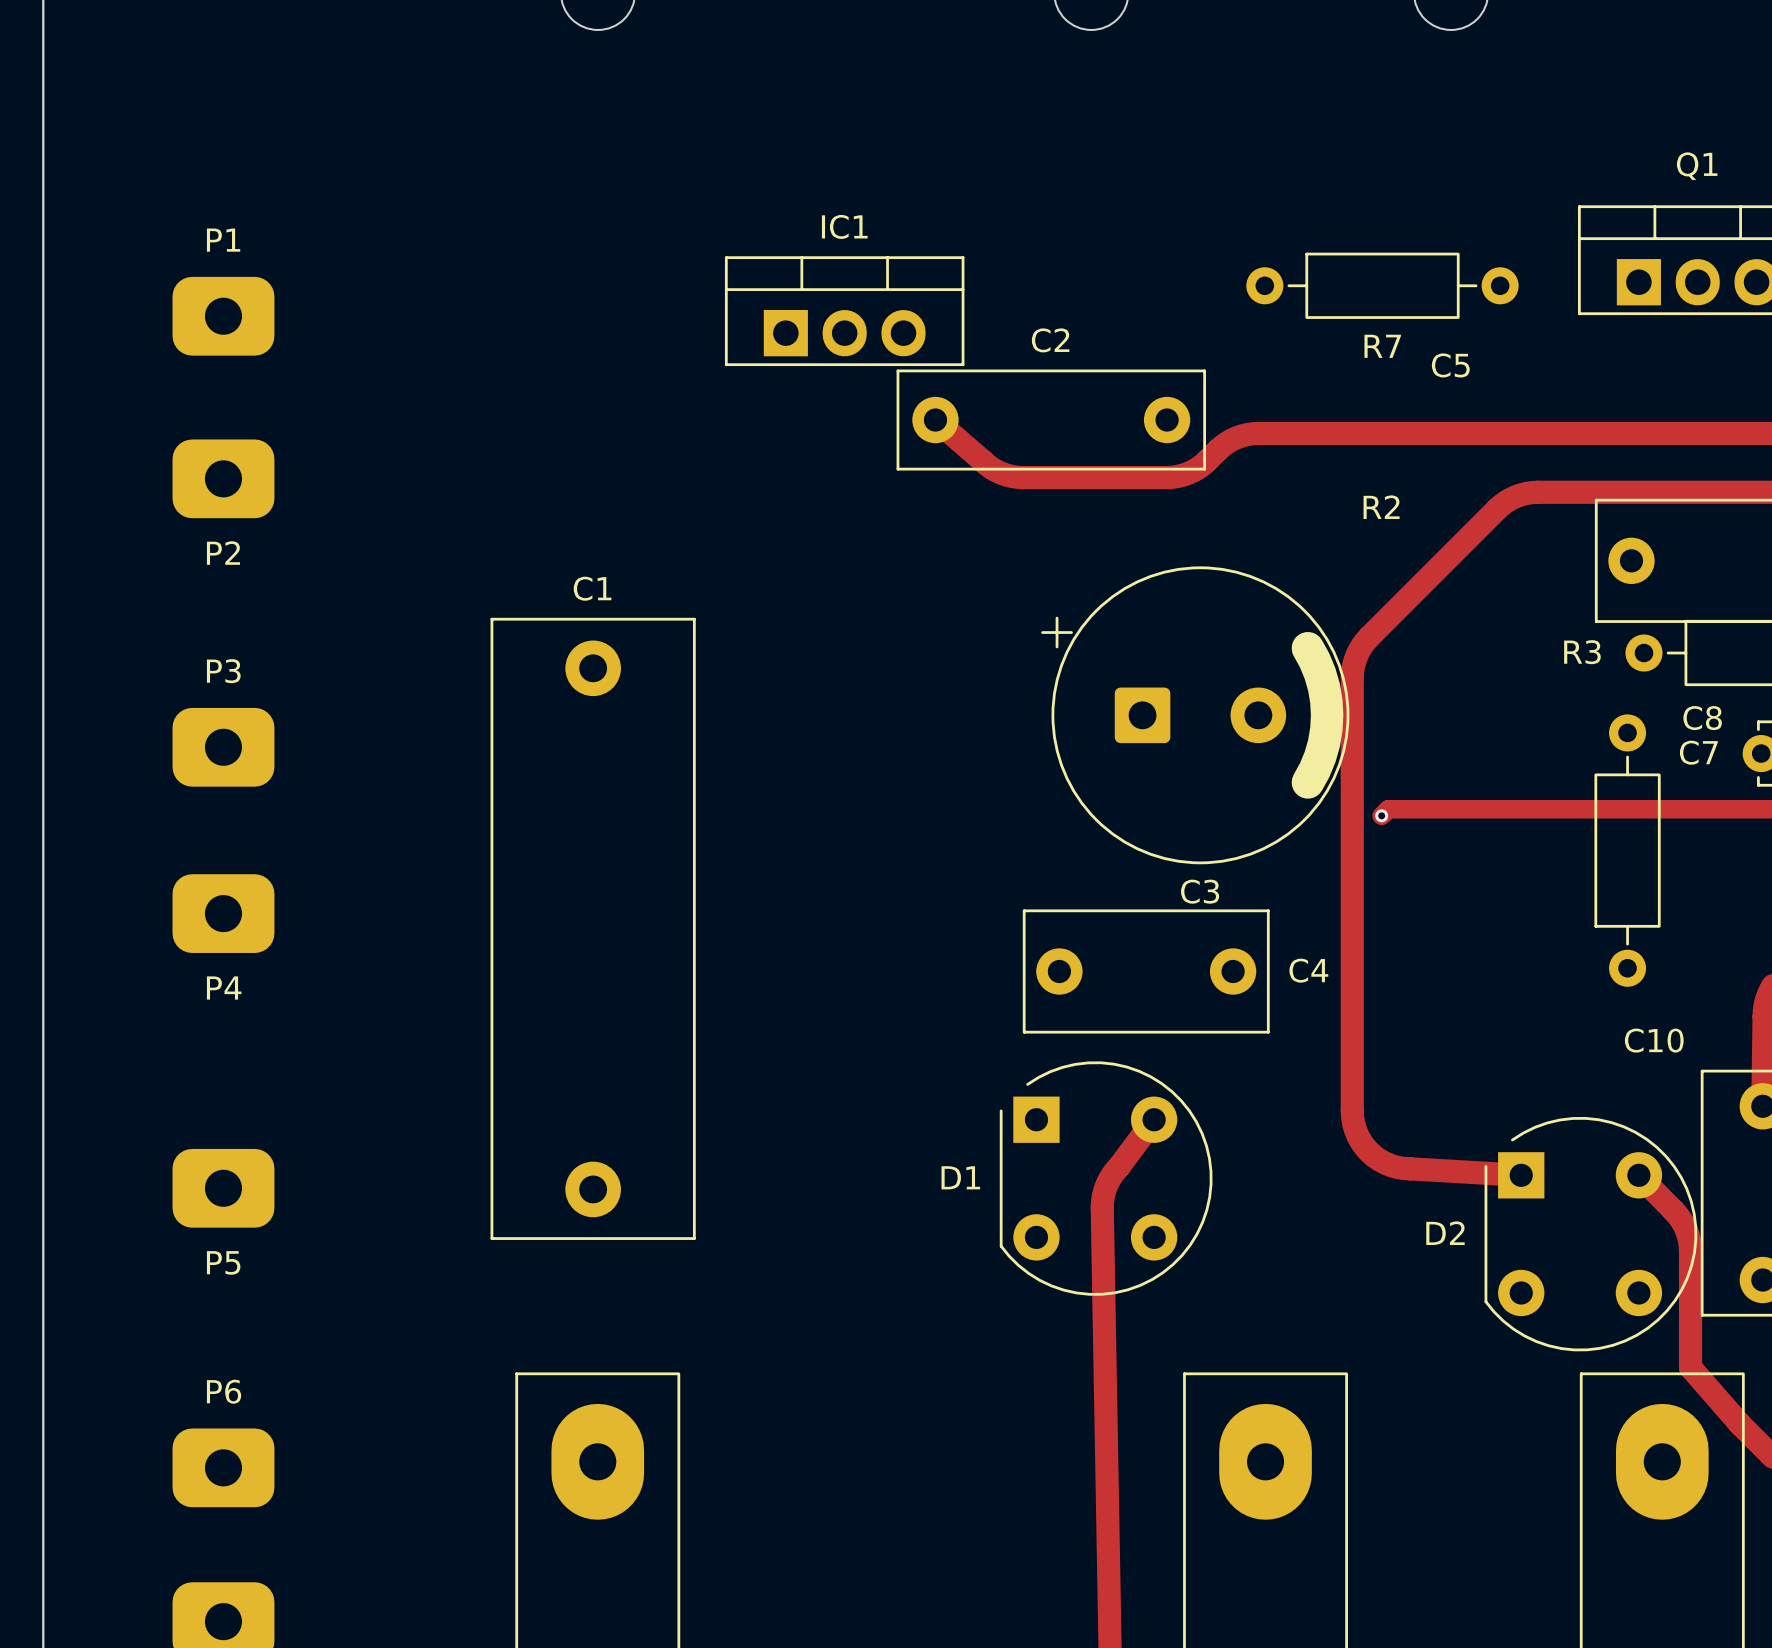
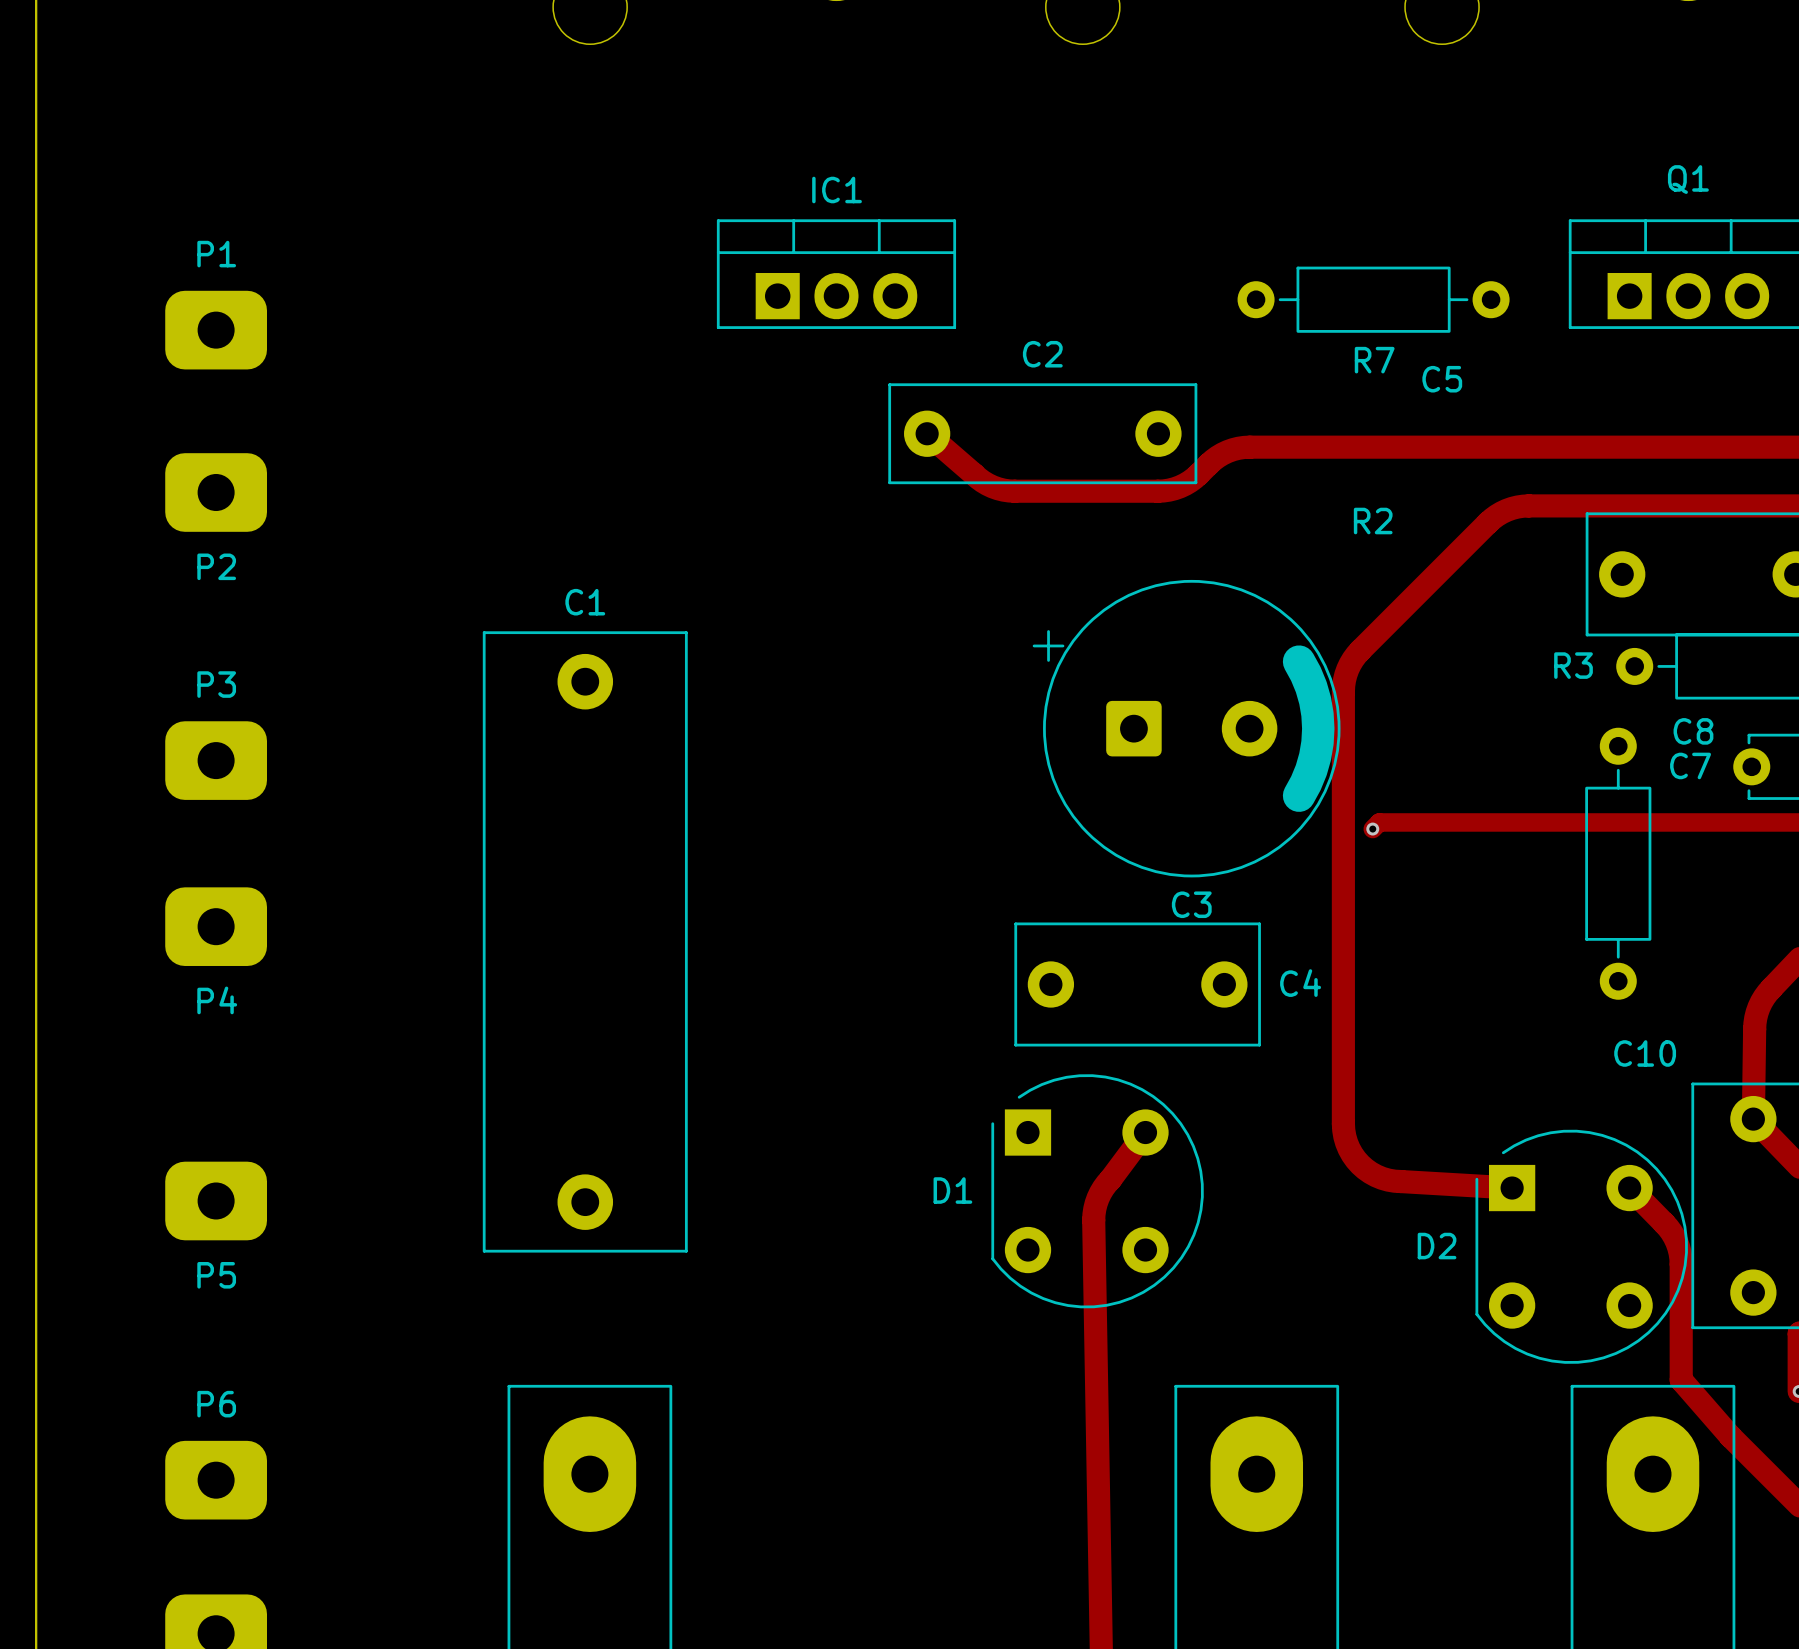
IC1 position: (844, 311) -> (836, 274)

